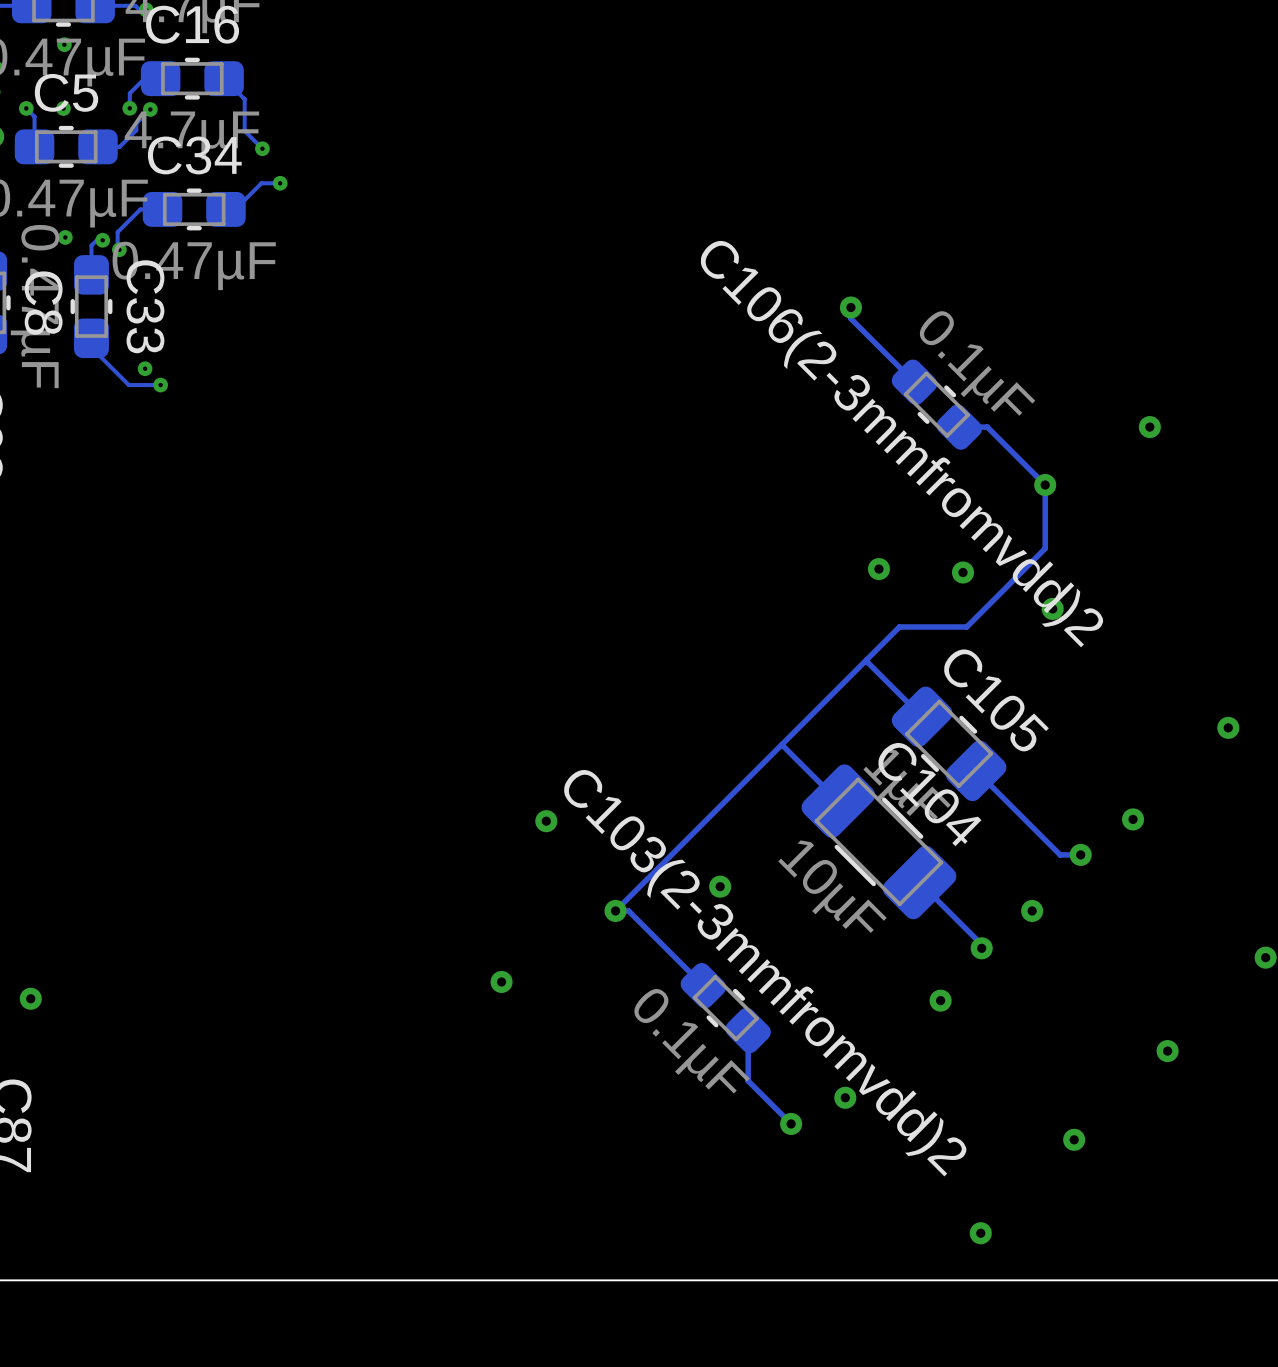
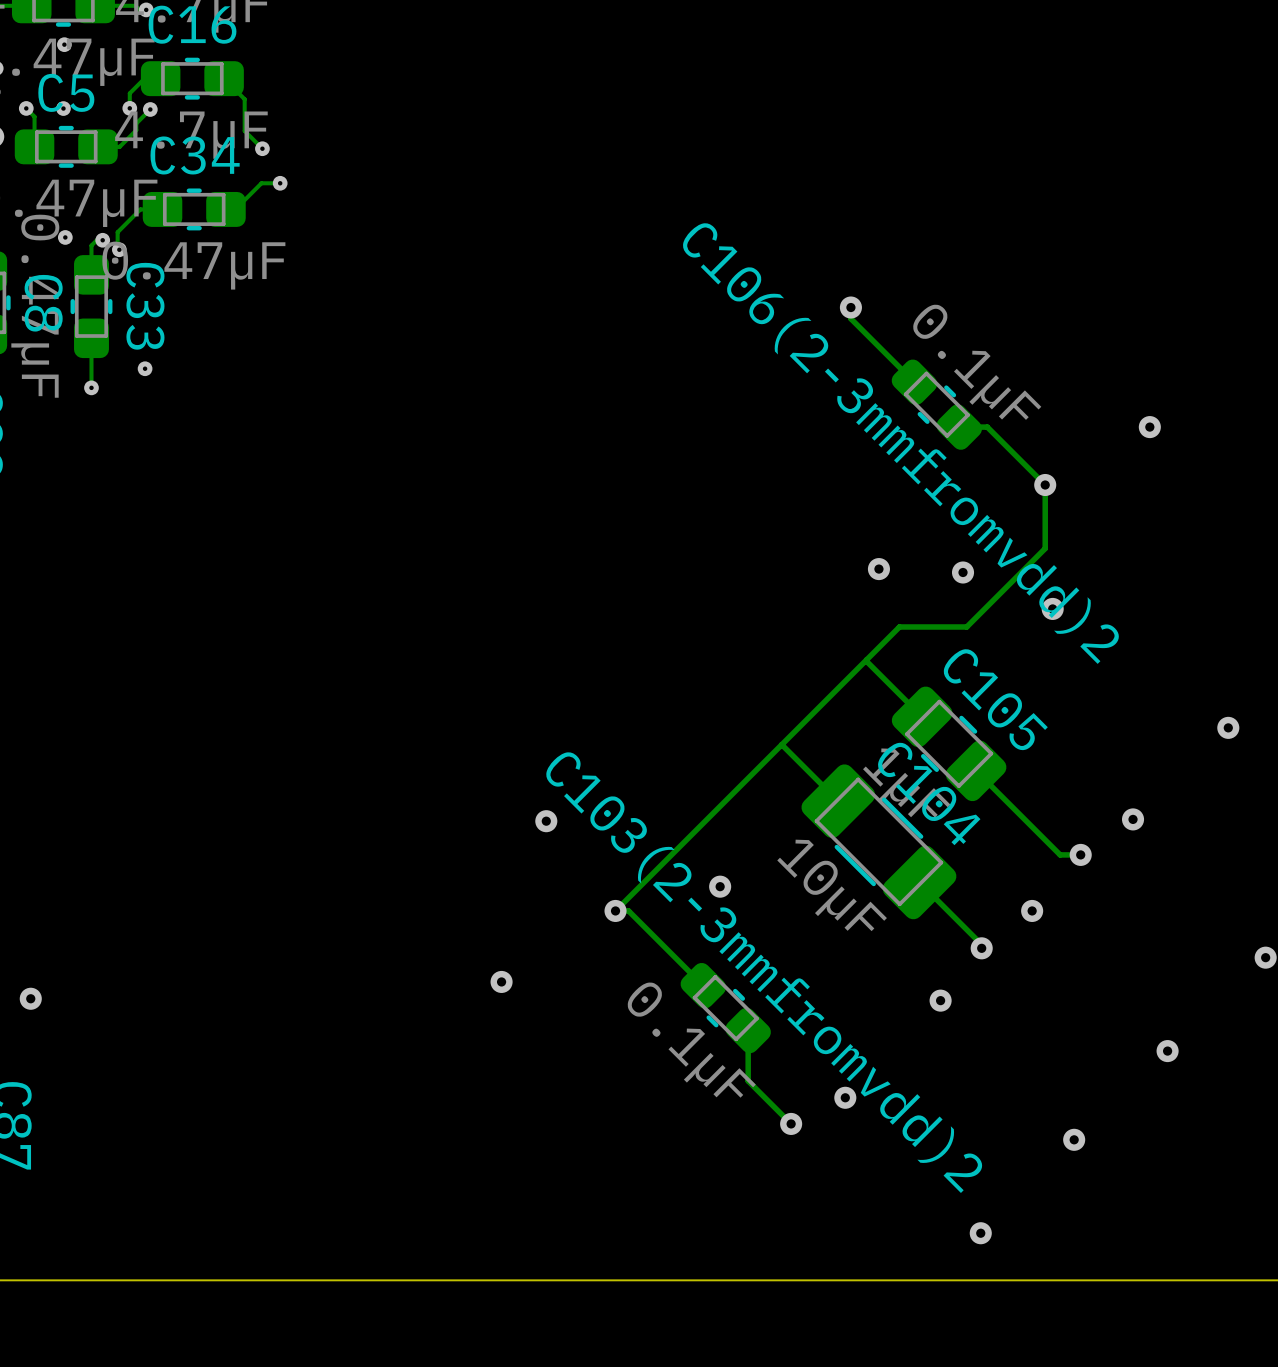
track: (91, 347) (128, 385) (160, 385) -> (91, 347) (91, 387)
via position: (160, 385) -> (91, 387)

